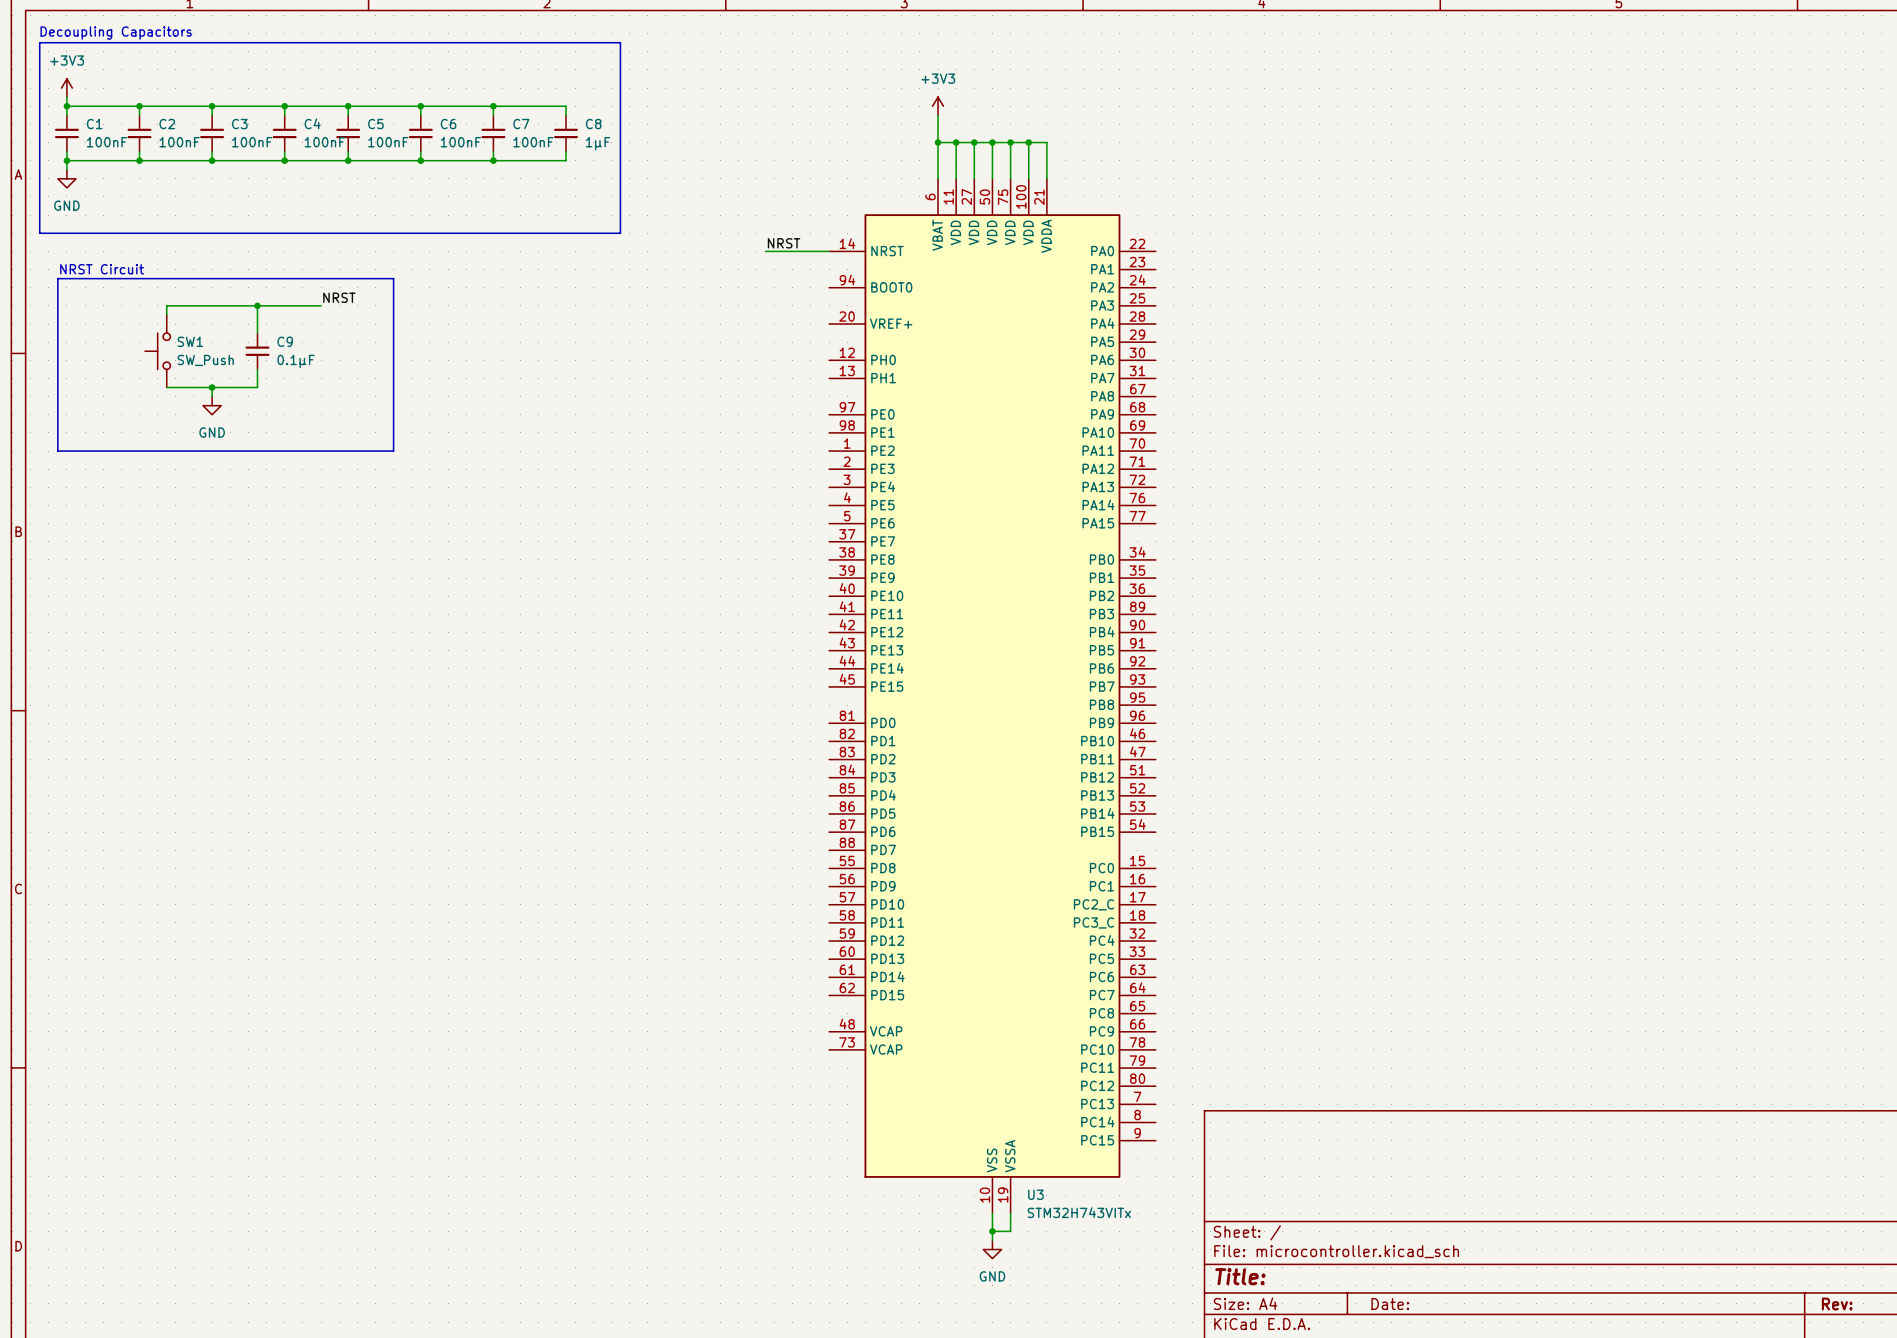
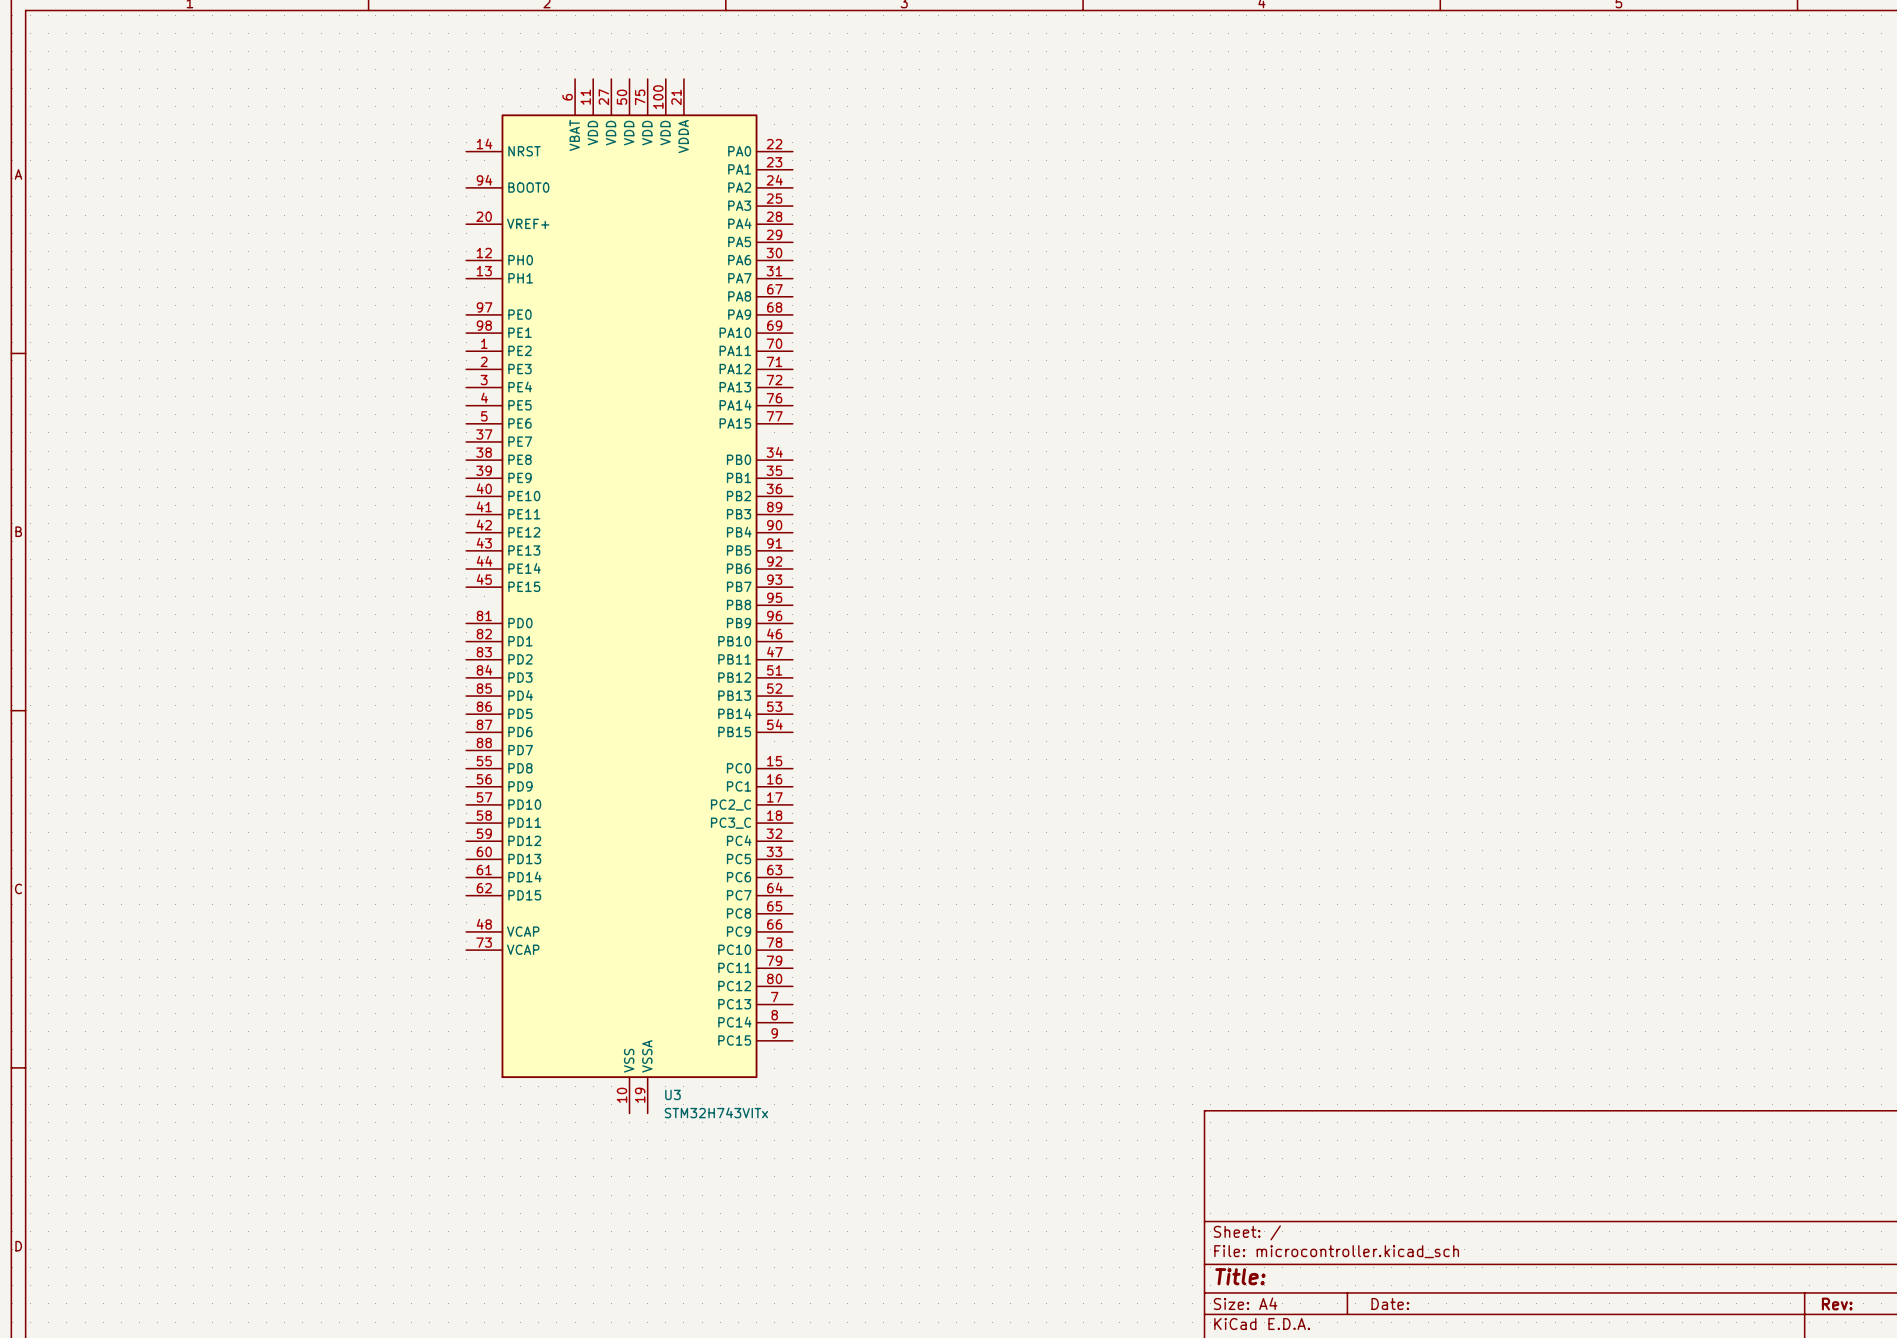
text: Decoupling Capacitors (116, 33) -> none
line: (39, 42) (620, 42) (620, 233) (39, 233) (39, 42) -> none
power symbol: +3V3 (66, 88) -> none
wire: (66, 97) (66, 115) -> none
wire: (66, 106) (565, 106) (565, 115) -> none
junction: (66, 106) -> none
wire: (139, 106) (139, 115) -> none
junction: (139, 106) -> none
wire: (212, 106) (212, 115) -> none
junction: (212, 106) -> none
wire: (284, 106) (284, 115) -> none
junction: (284, 106) -> none
wire: (348, 106) (348, 115) -> none
junction: (348, 106) -> none
wire: (420, 106) (420, 115) -> none
junction: (420, 106) -> none
wire: (493, 106) (493, 115) -> none
junction: (493, 106) -> none
power symbol: +3V3 (938, 106) -> none
wire: (938, 115) (938, 178) -> none
C1: 100nF (66, 133) -> none
C2: 100nF (139, 133) -> none
C3: 100nF (212, 133) -> none
C4: 100nF (284, 133) -> none
C5: 100nF (348, 133) -> none
C6: 100nF (420, 133) -> none
C7: 100nF (493, 133) -> none
C8: 1μF (565, 133) -> none
wire: (938, 142) (1046, 142) (1046, 178) -> none
junction: (938, 142) -> none
wire: (956, 142) (956, 178) -> none
junction: (956, 142) -> none
wire: (974, 142) (974, 178) -> none
junction: (974, 142) -> none
wire: (992, 142) (992, 178) -> none
junction: (992, 142) -> none
wire: (1010, 142) (1010, 178) -> none
junction: (1010, 142) -> none
wire: (1028, 142) (1028, 178) -> none
junction: (1028, 142) -> none
wire: (66, 151) (66, 169) -> none
wire: (139, 151) (139, 160) -> none
wire: (212, 151) (212, 160) -> none
wire: (284, 151) (284, 160) -> none
wire: (348, 151) (348, 160) -> none
wire: (420, 151) (420, 160) -> none
wire: (493, 151) (493, 160) -> none
wire: (565, 151) (565, 160) (66, 160) -> none
junction: (66, 160) -> none
junction: (139, 160) -> none
junction: (212, 160) -> none
junction: (284, 160) -> none
junction: (348, 160) -> none
junction: (420, 160) -> none
junction: (493, 160) -> none
power symbol: GND (66, 178) -> none
label: NRST (784, 243) -> none
wire: (765, 251) (829, 251) -> none
text: NRST Circuit (102, 269) -> none
line: (57, 278) (393, 278) (393, 451) (57, 451) (57, 278) -> none
label: NRST (339, 297) -> none
wire: (257, 305) (257, 333) -> none
junction: (257, 305) -> none
wire: (321, 305) (166, 305) (166, 314) -> none
SW1: SW_Push (157, 351) -> none
C9: 0.1μF (257, 351) -> none
wire: (257, 369) (257, 387) (166, 387) -> none
wire: (212, 387) (212, 396) -> none
junction: (212, 387) -> none
power symbol: GND (212, 405) -> none
U3 position: (992, 696) -> (629, 596)
wire: (992, 1213) (992, 1240) -> none
wire: (1010, 1213) (1010, 1231) (992, 1231) -> none
junction: (992, 1231) -> none
power symbol: GND (992, 1249) -> none

